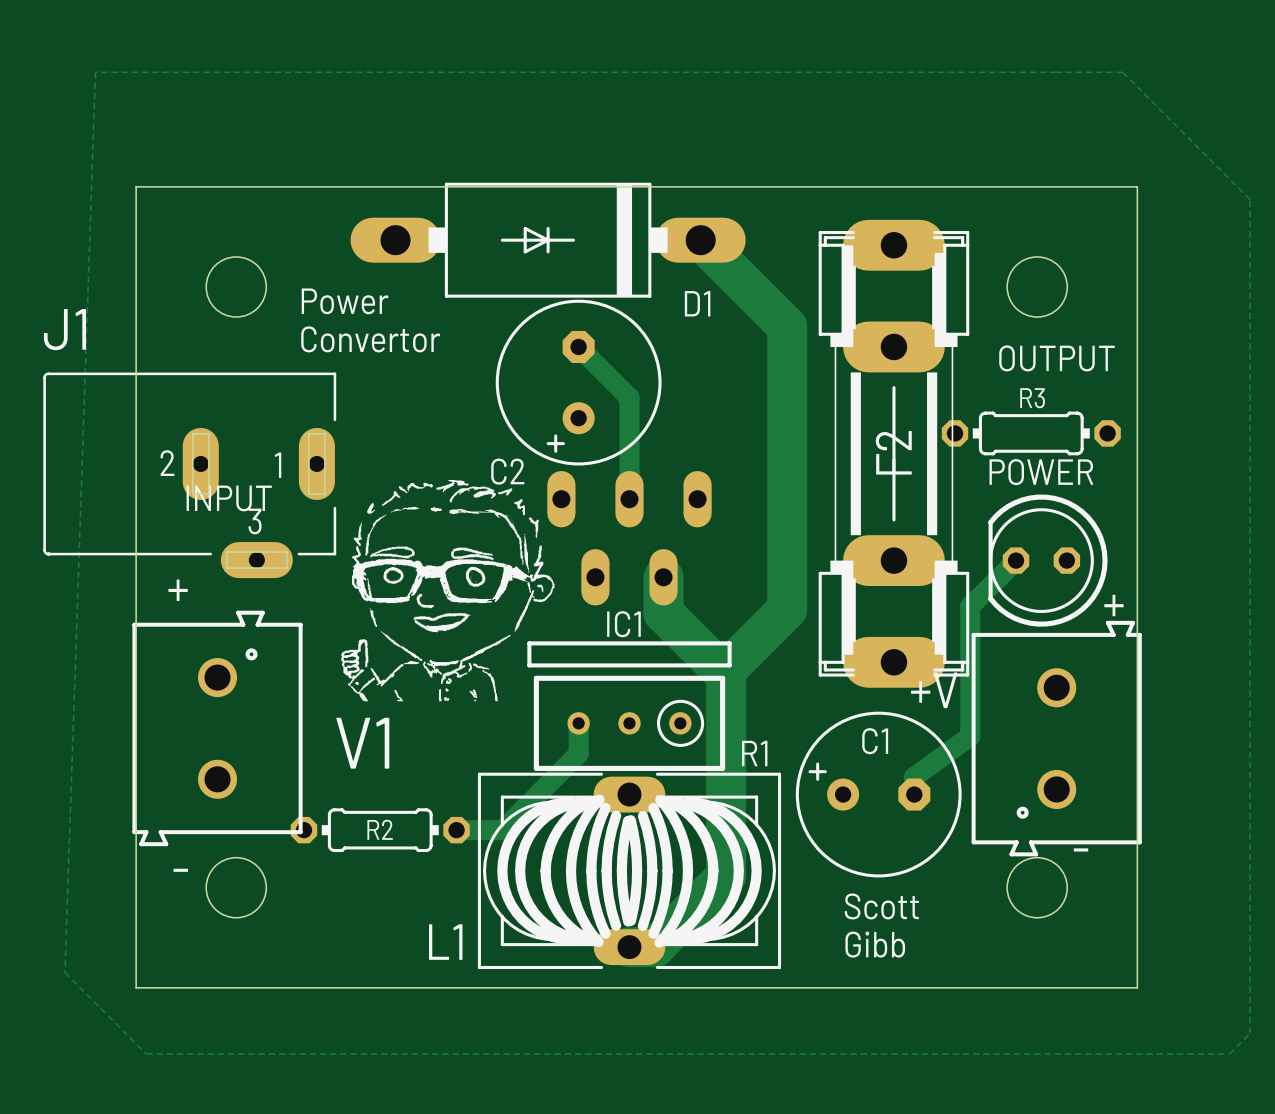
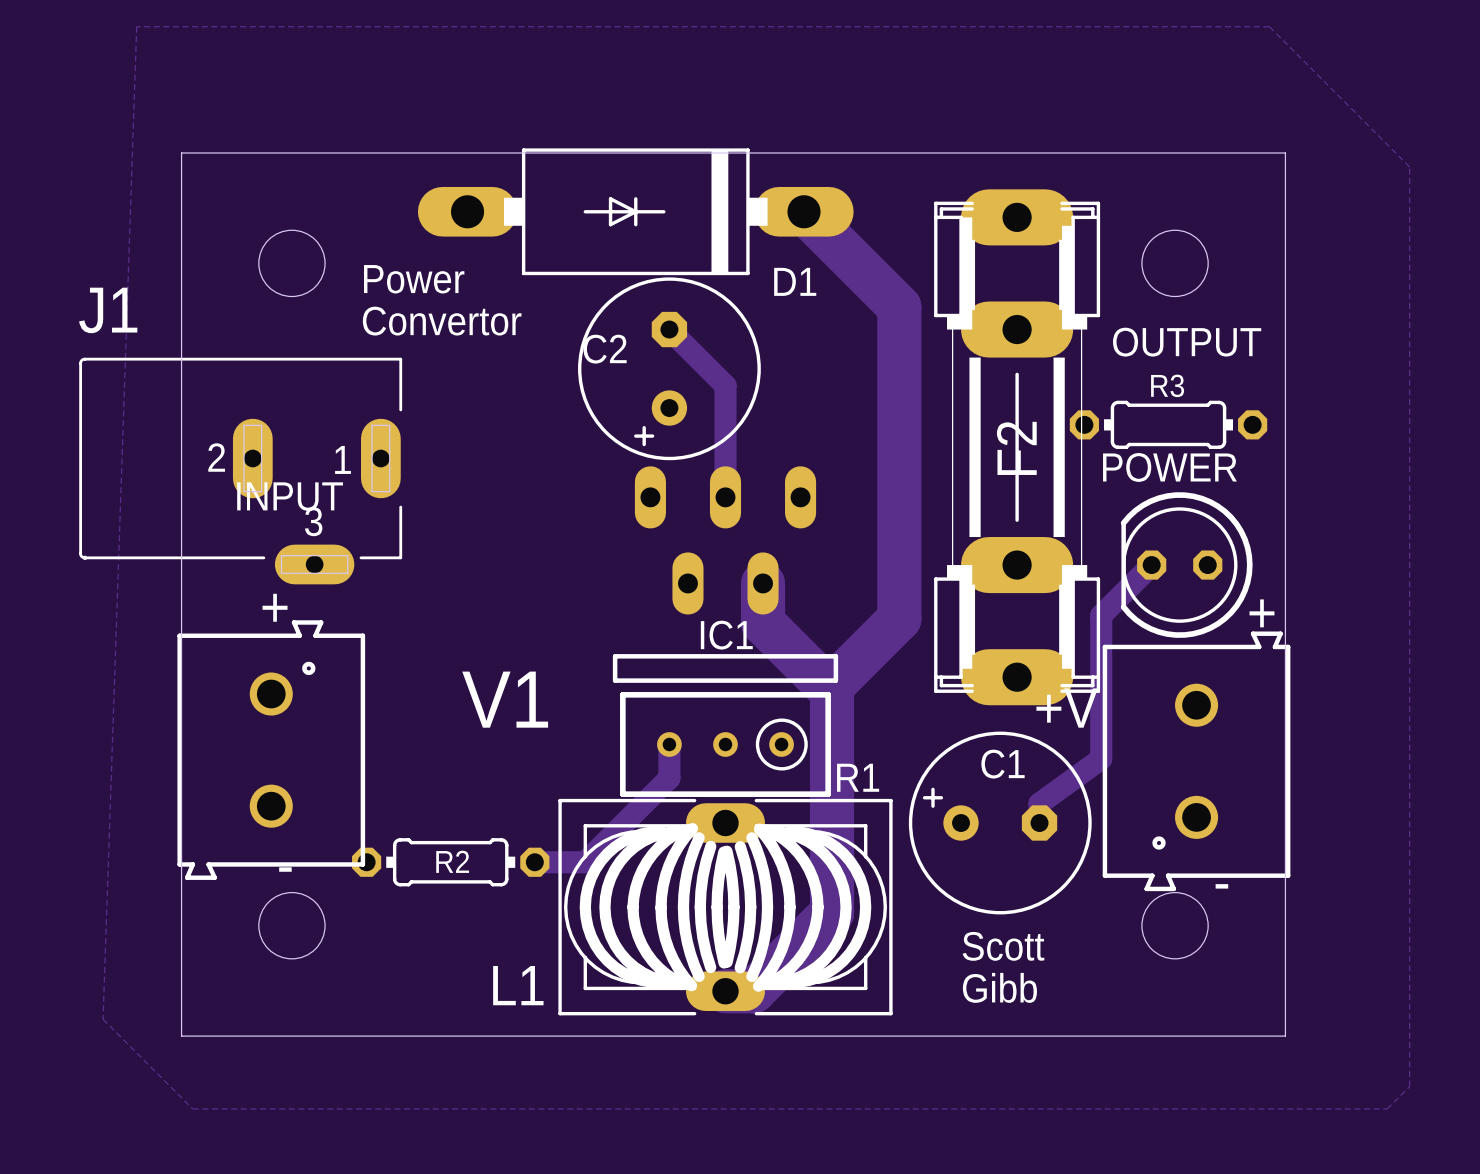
C2 name position: C2 (507, 471) -> C2 (605, 349)
drawing: [341, 479, 555, 702] -> none
text position: + (178, 590) -> + (275, 607)
text position: V1 (362, 743) -> V1 (505, 699)
text position: - (180, 870) -> - (285, 869)

